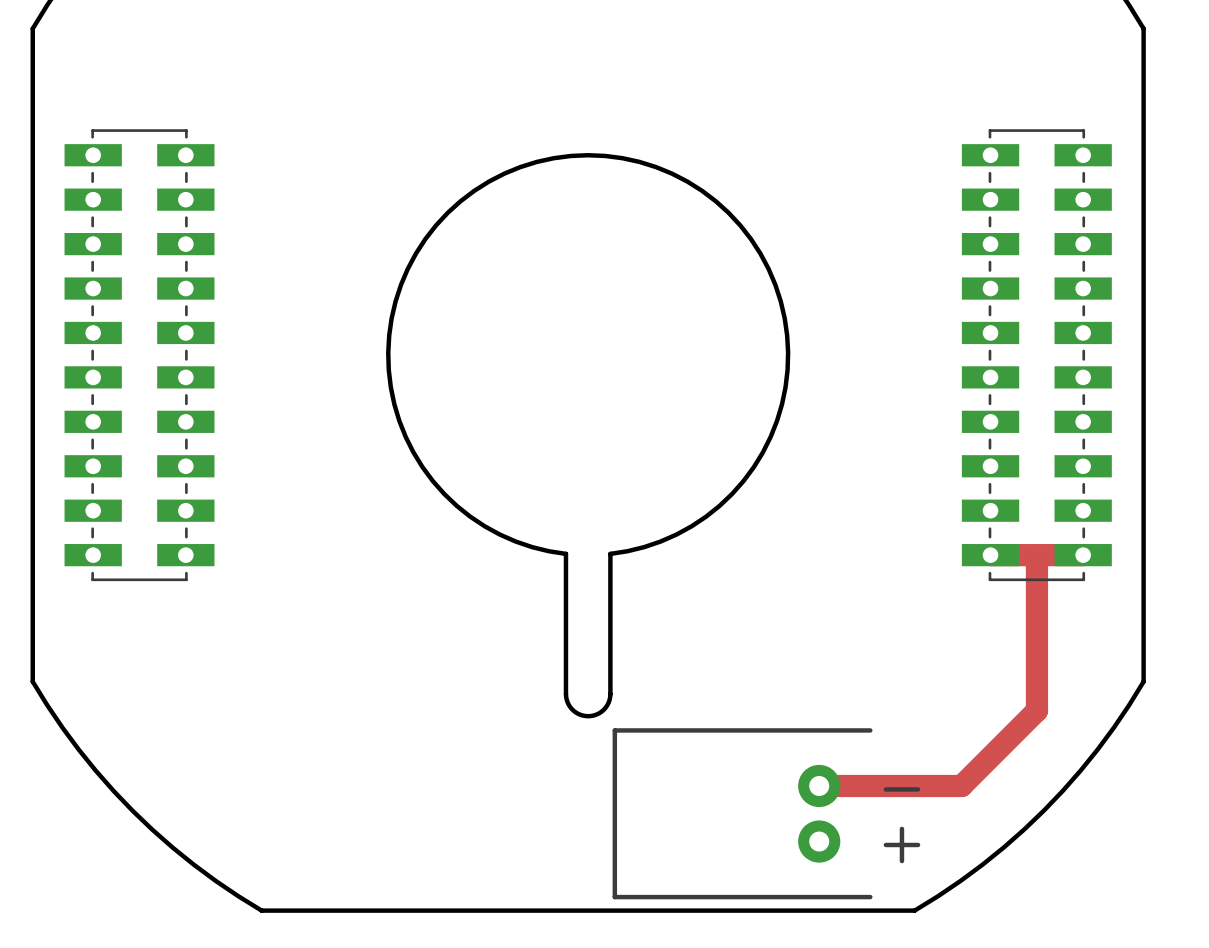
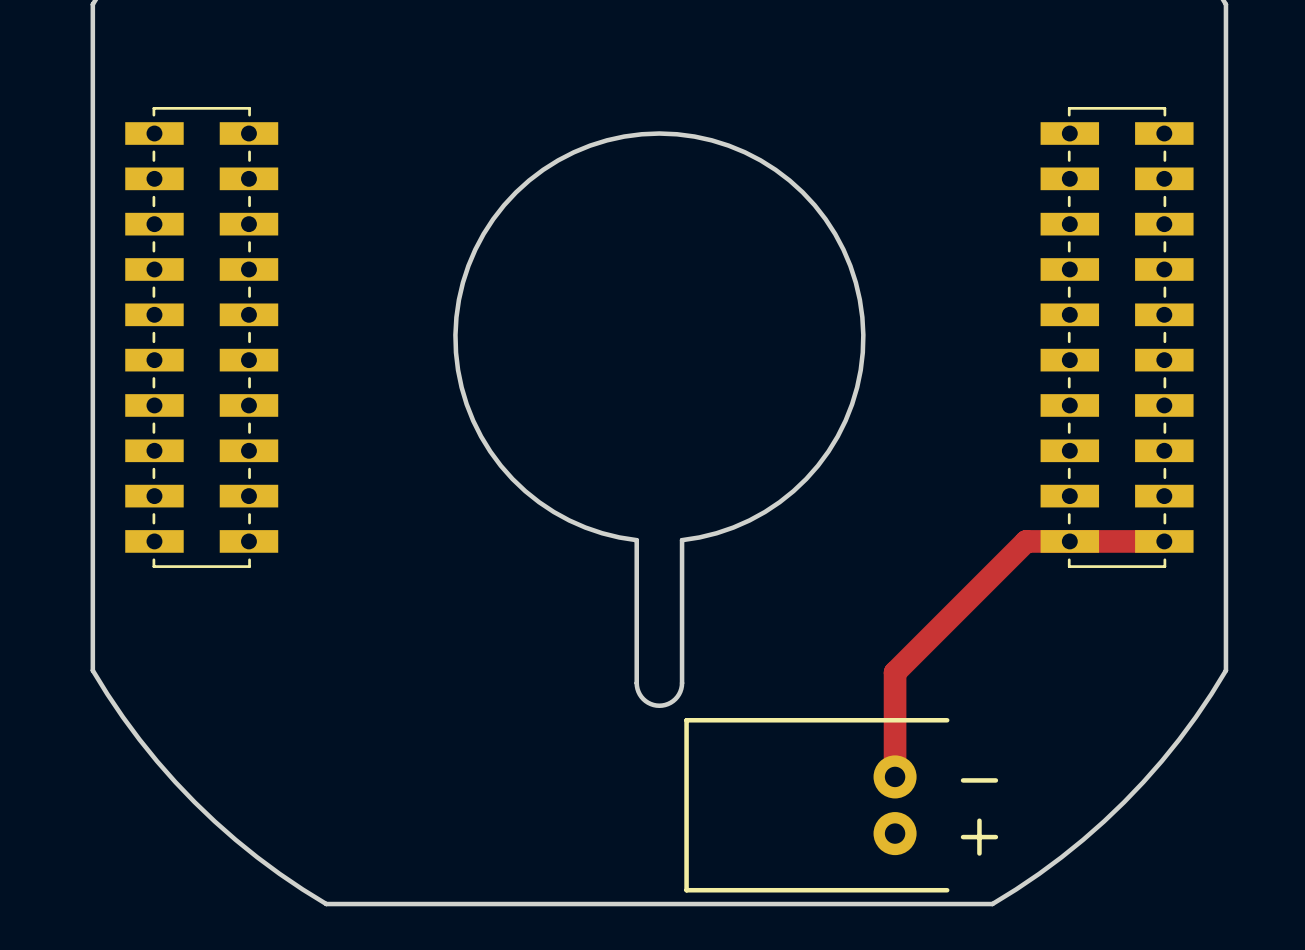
track: (1039, 555) (1036, 557) (1036, 710) (961, 785) (819, 785) -> (1069, 541) (1026, 541) (895, 672) (895, 776)

